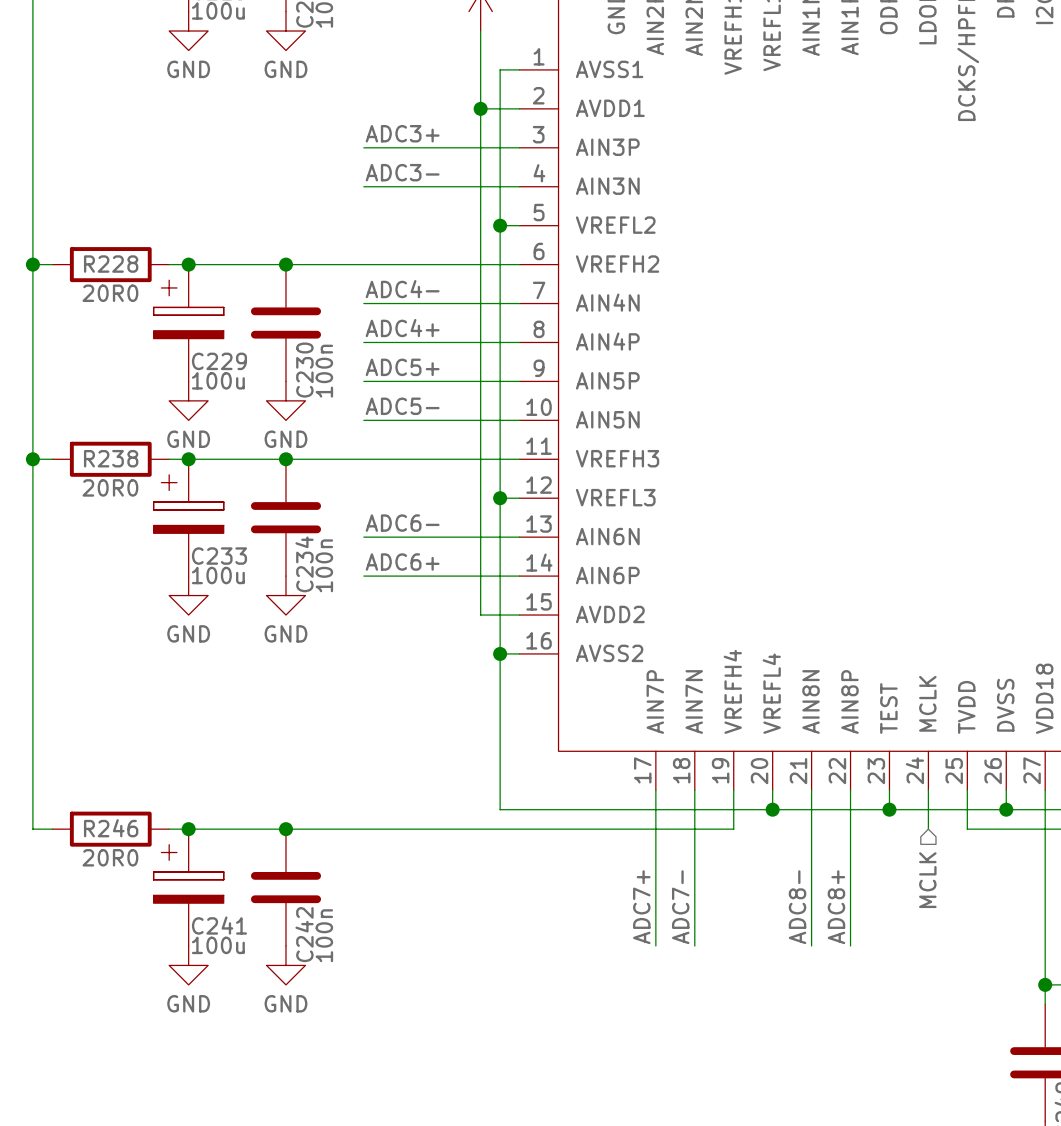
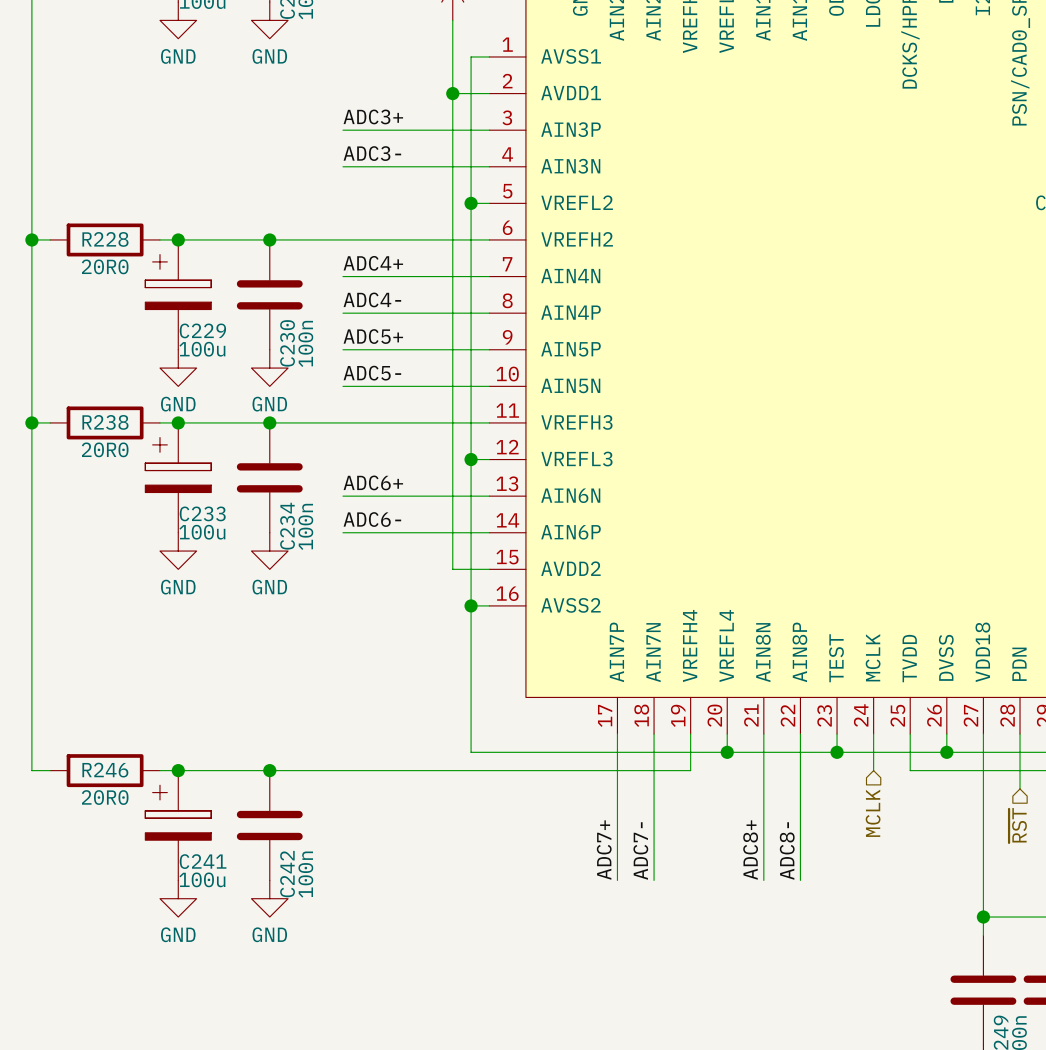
label: ADC4- (402, 289) -> ADC4+ (373, 263)
label: ADC4+ (402, 328) -> ADC4- (372, 299)
label: ADC6- (402, 523) -> ADC6+ (373, 482)
label: ADC6+ (402, 562) -> ADC6- (372, 519)
label: ADC8- (797, 907) -> ADC8+ (750, 850)
label: ADC8+ (836, 907) -> ADC8- (787, 851)

